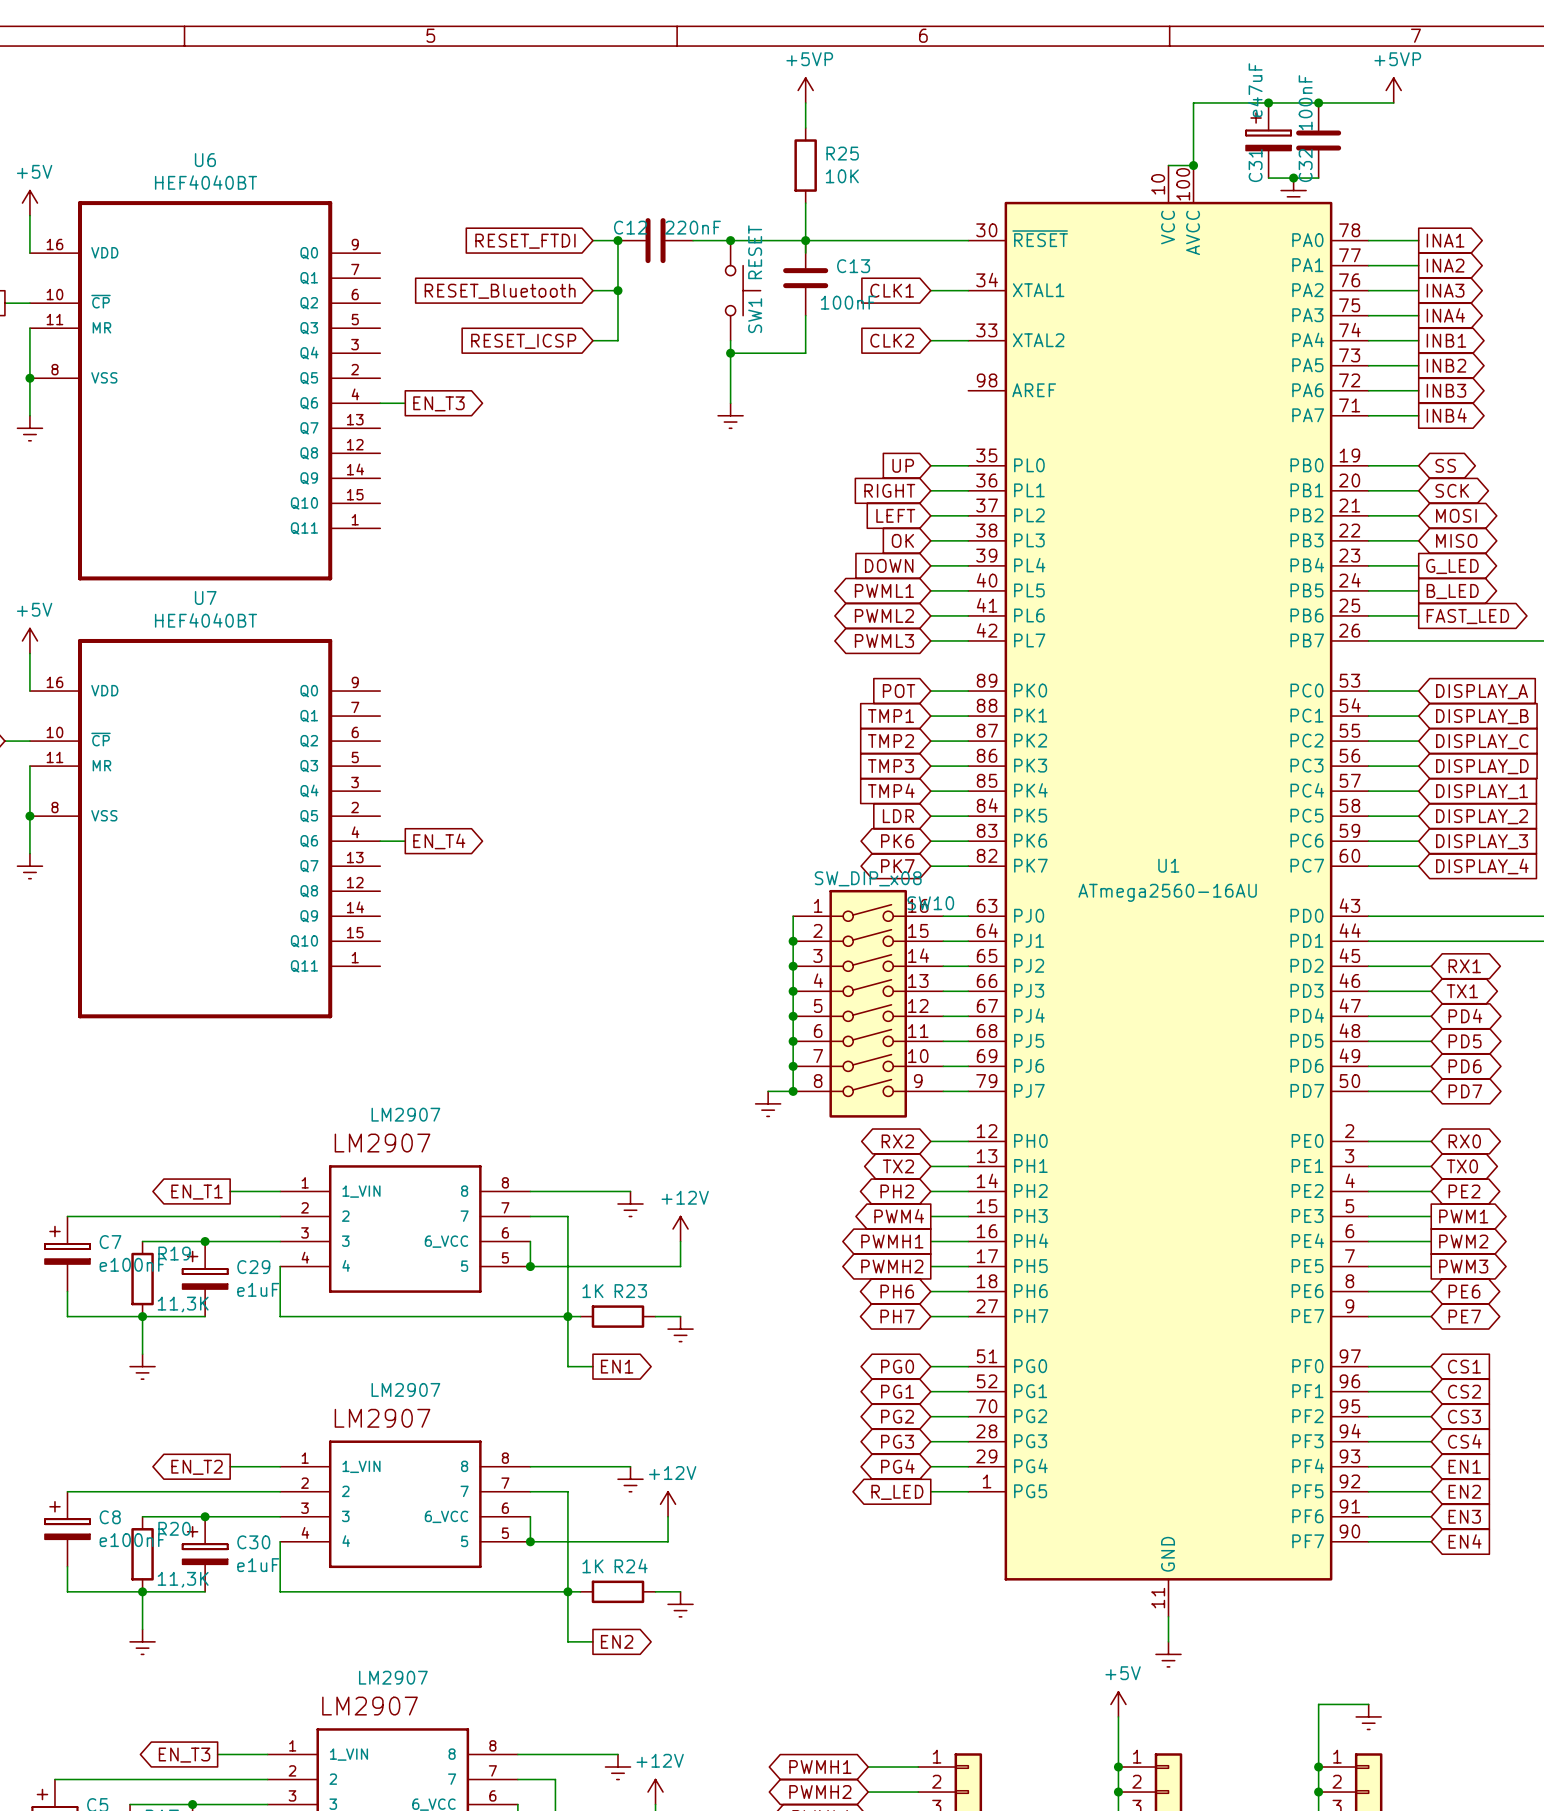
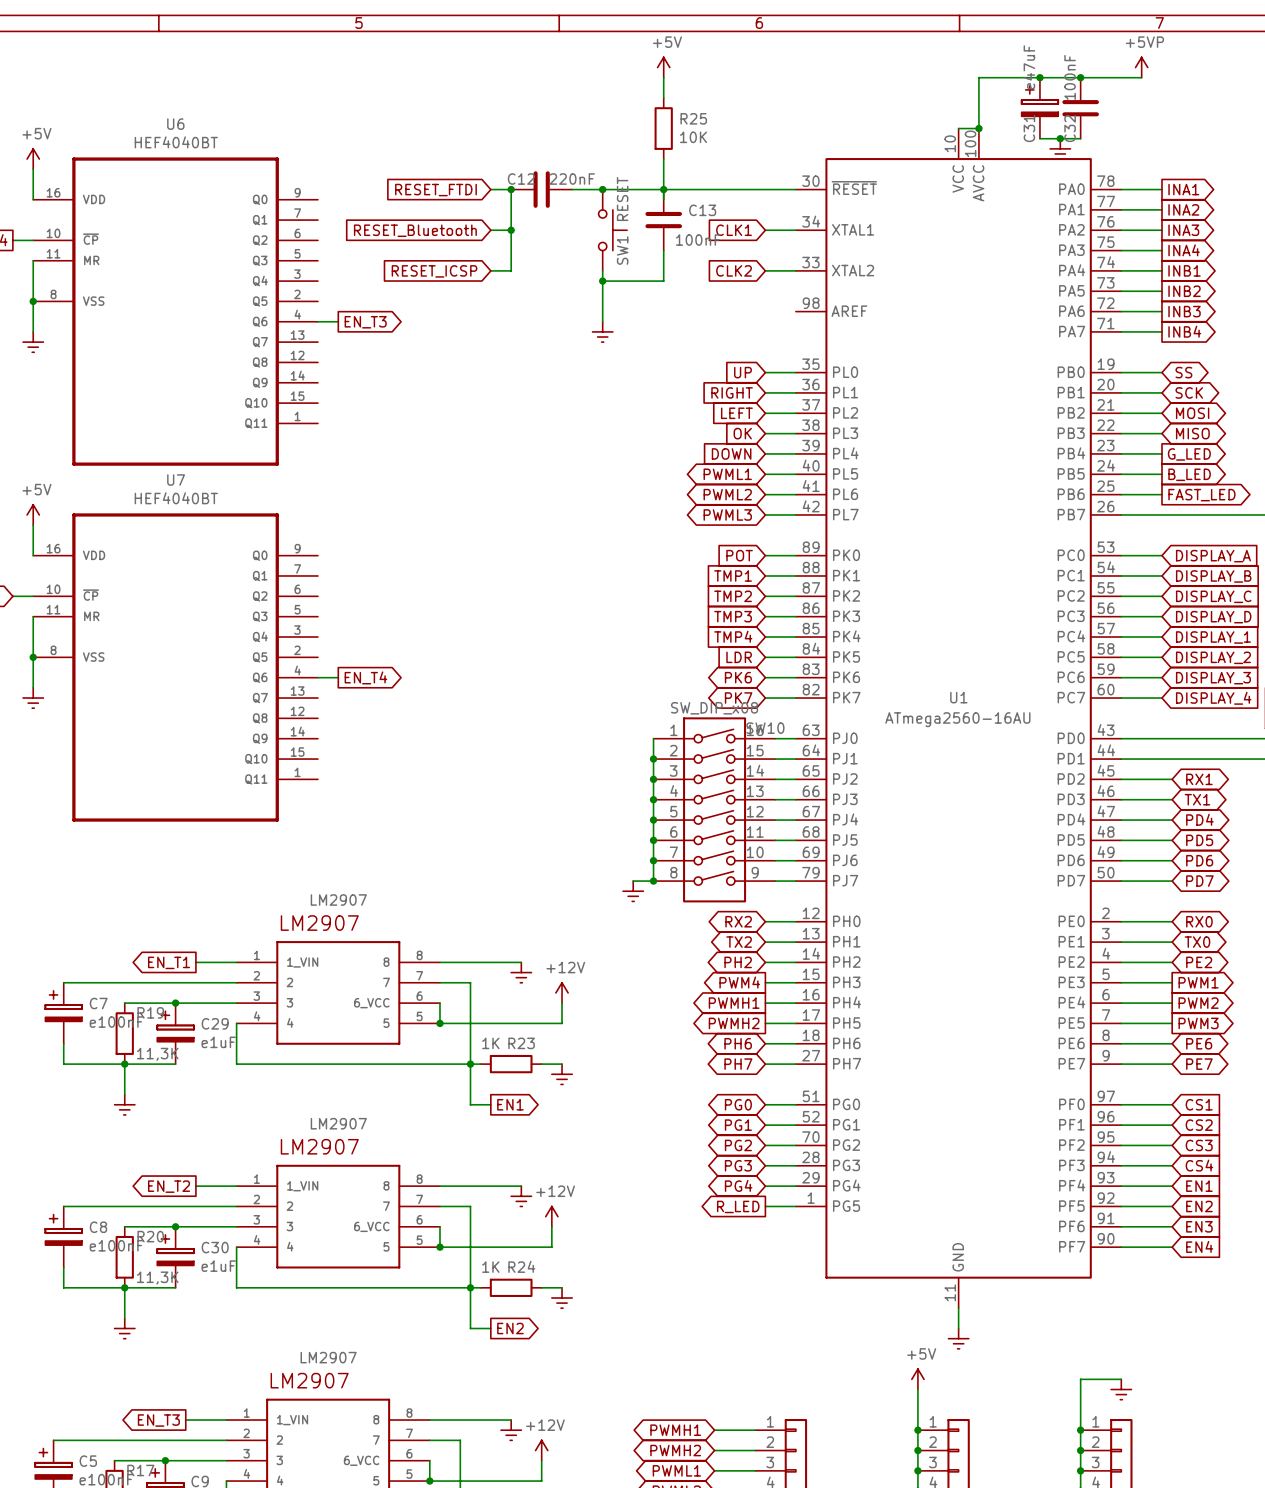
power symbol: +5VP (805, 90) -> +5V (663, 67)

